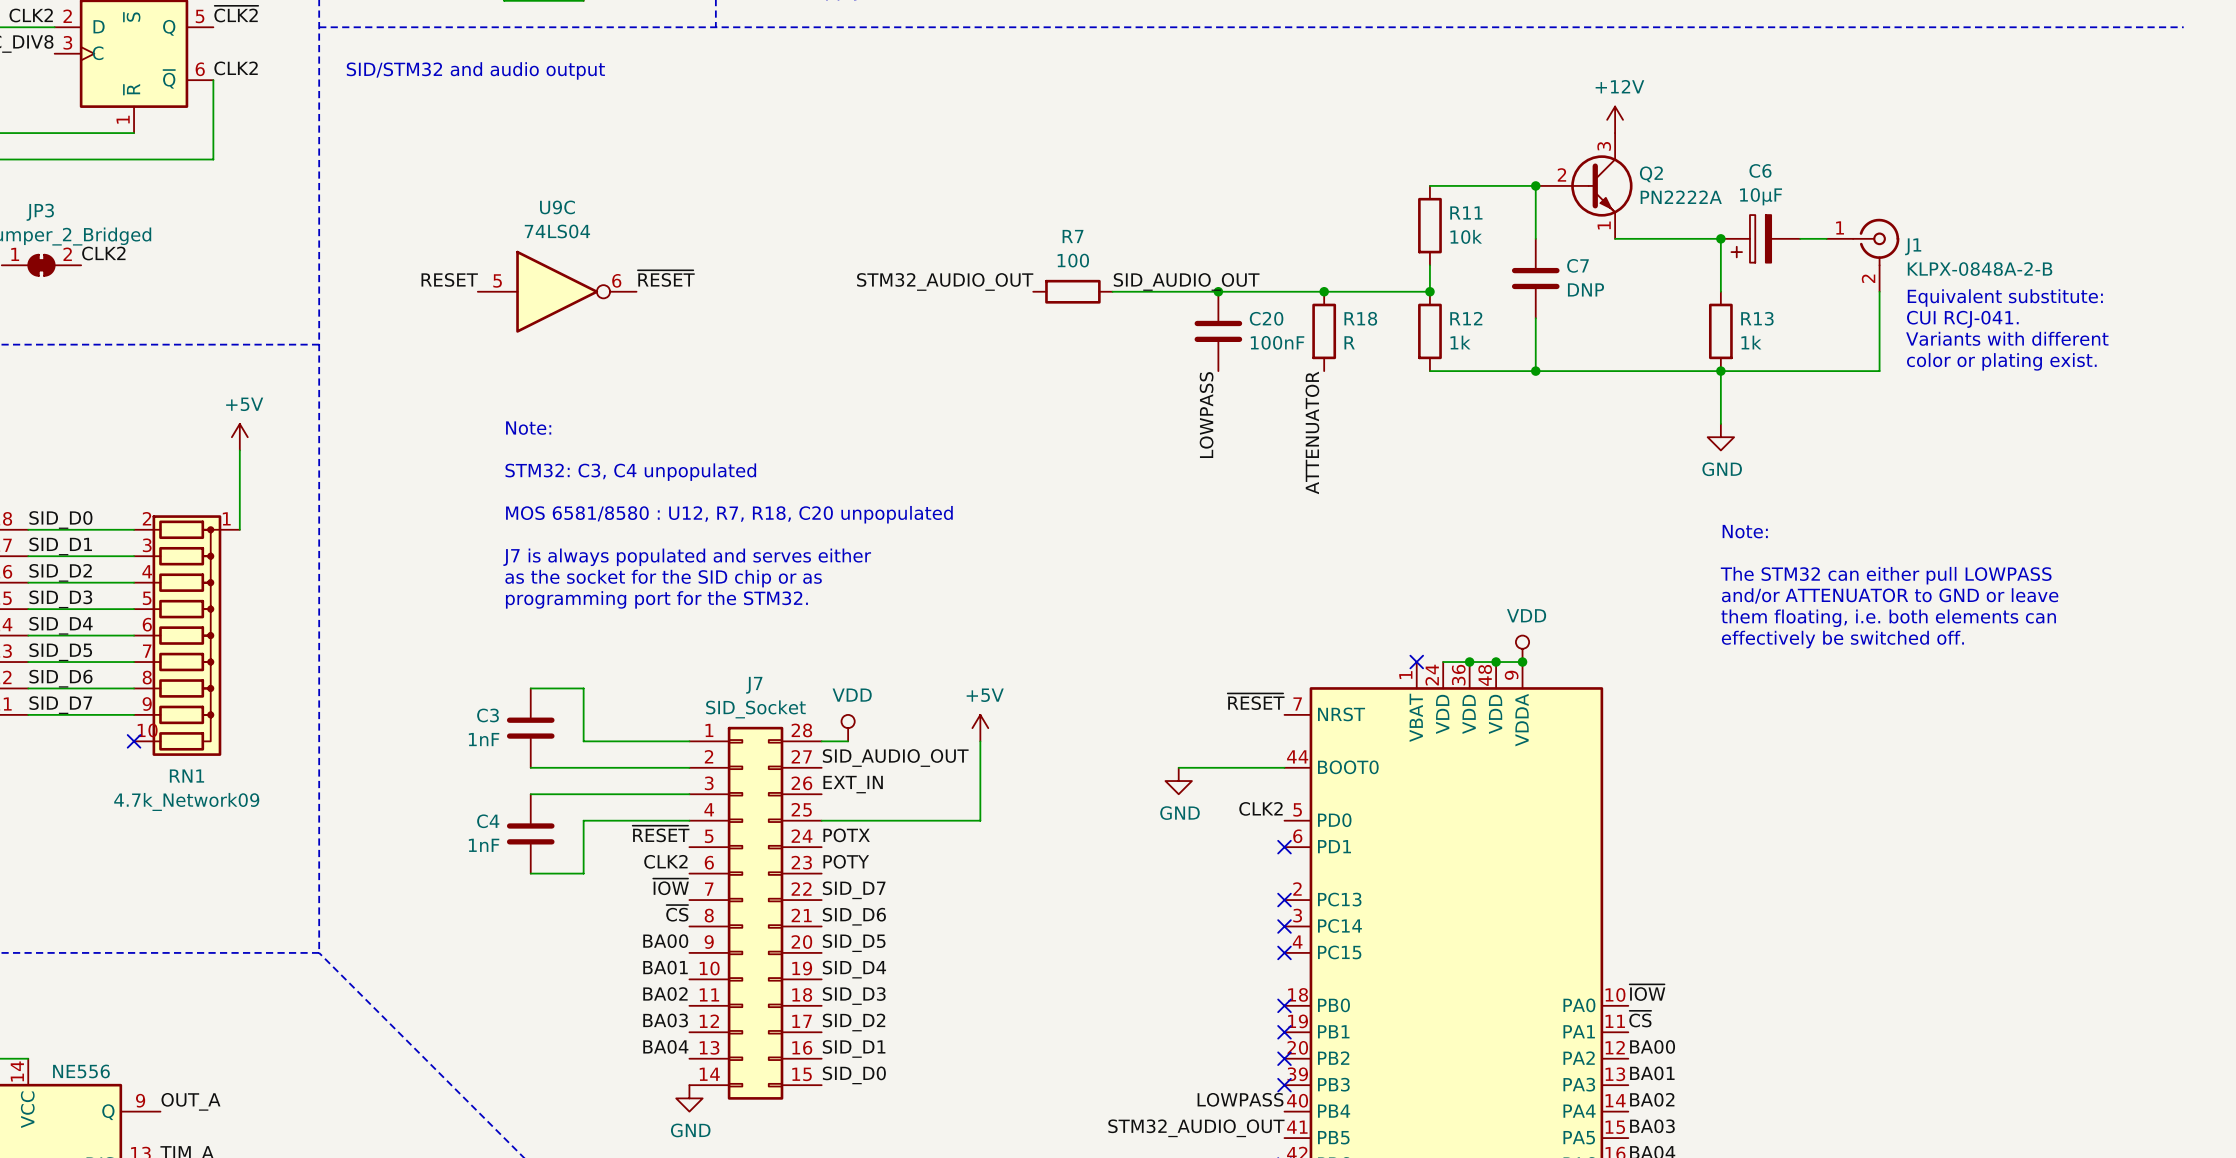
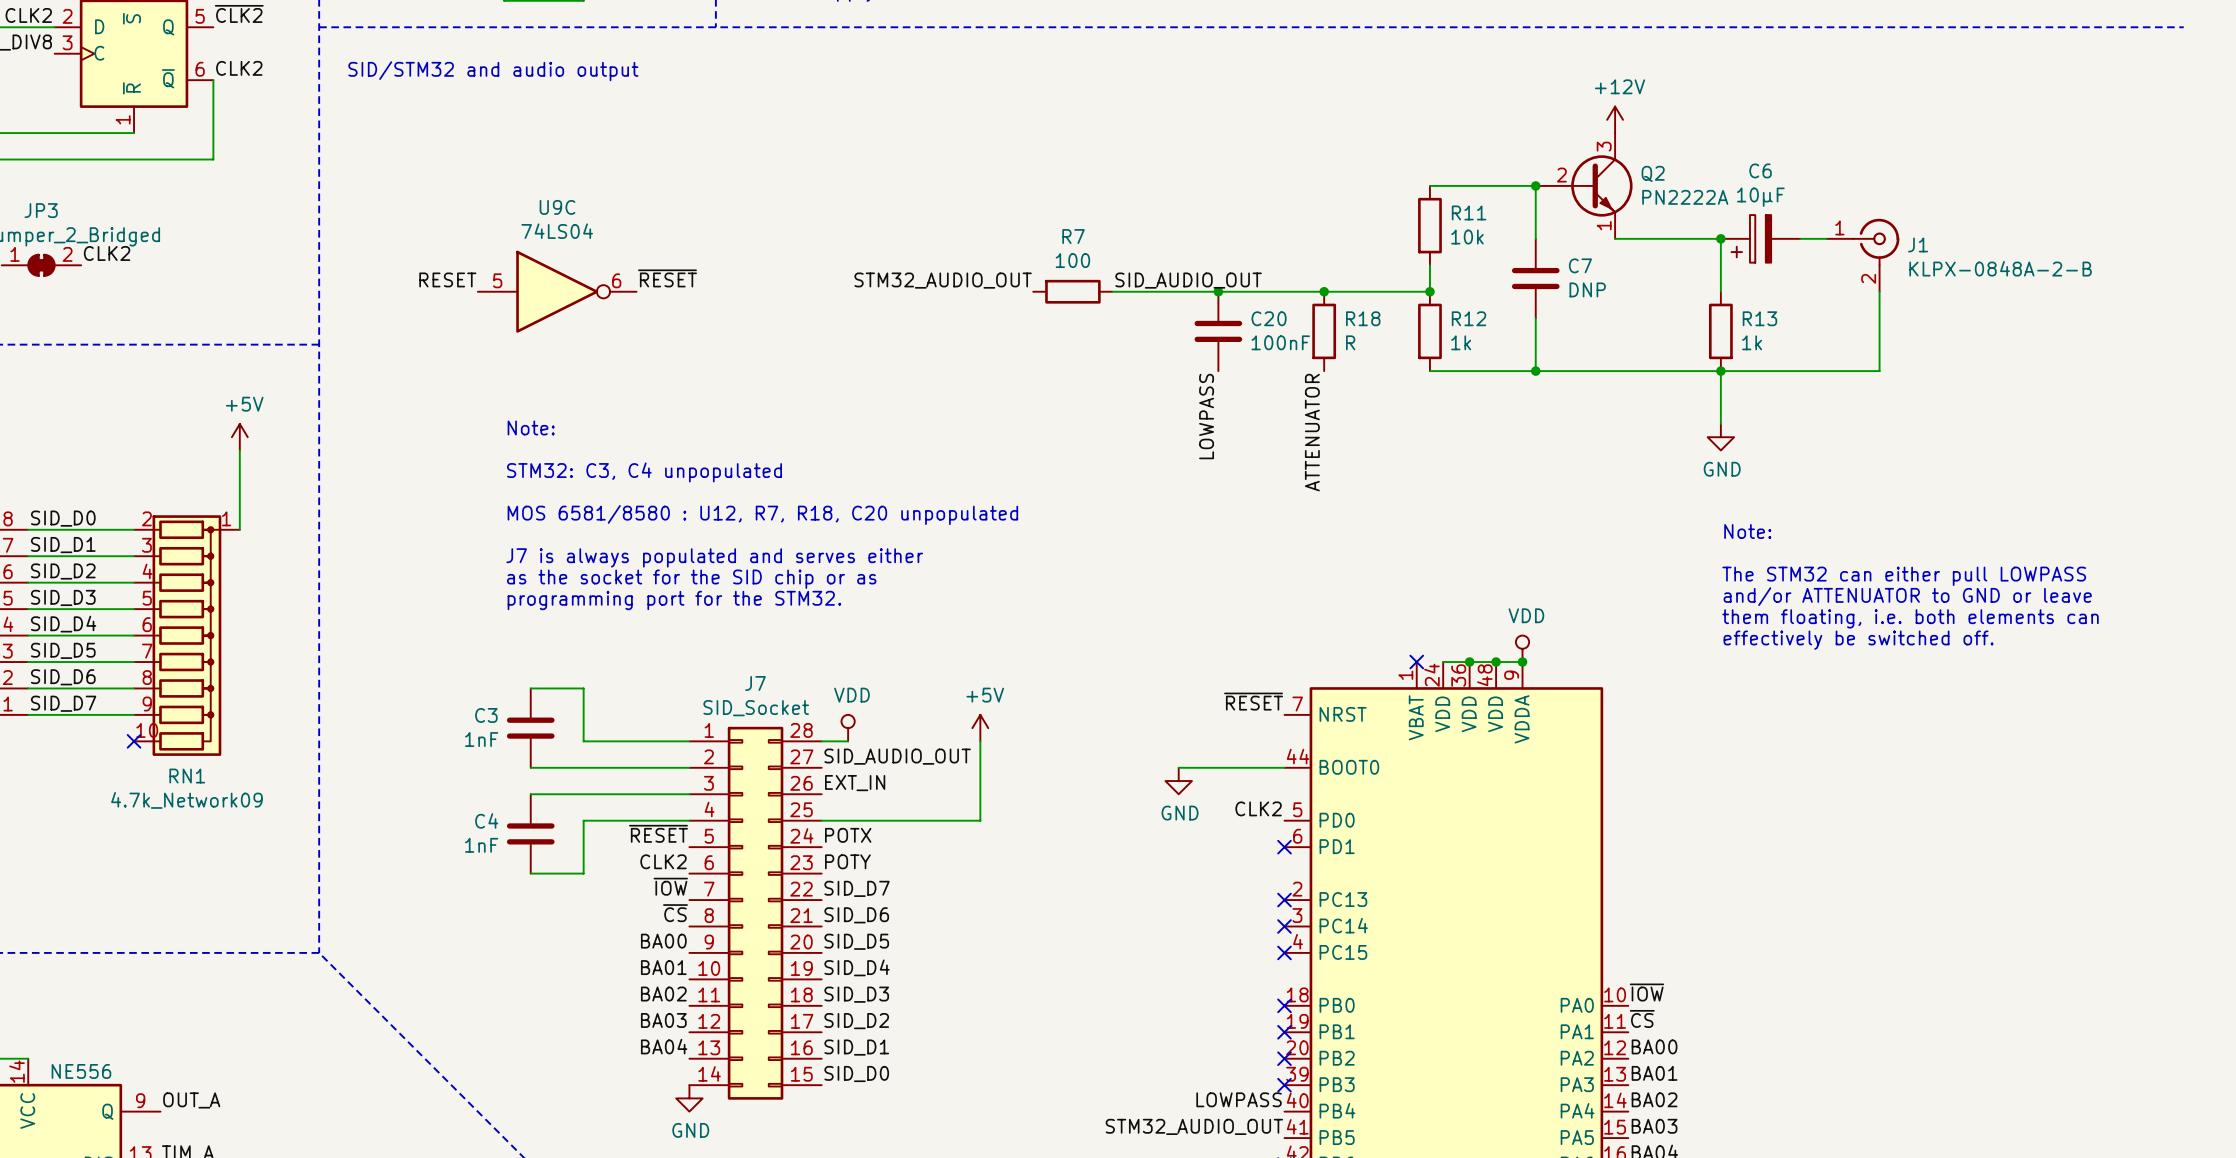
text: Equivalent substitute: (2005, 297) -> none
text: CUI RCJ-041. (1962, 319) -> none
text: Variants with different (2007, 338) -> none
text: color or plating exist. (2001, 361) -> none

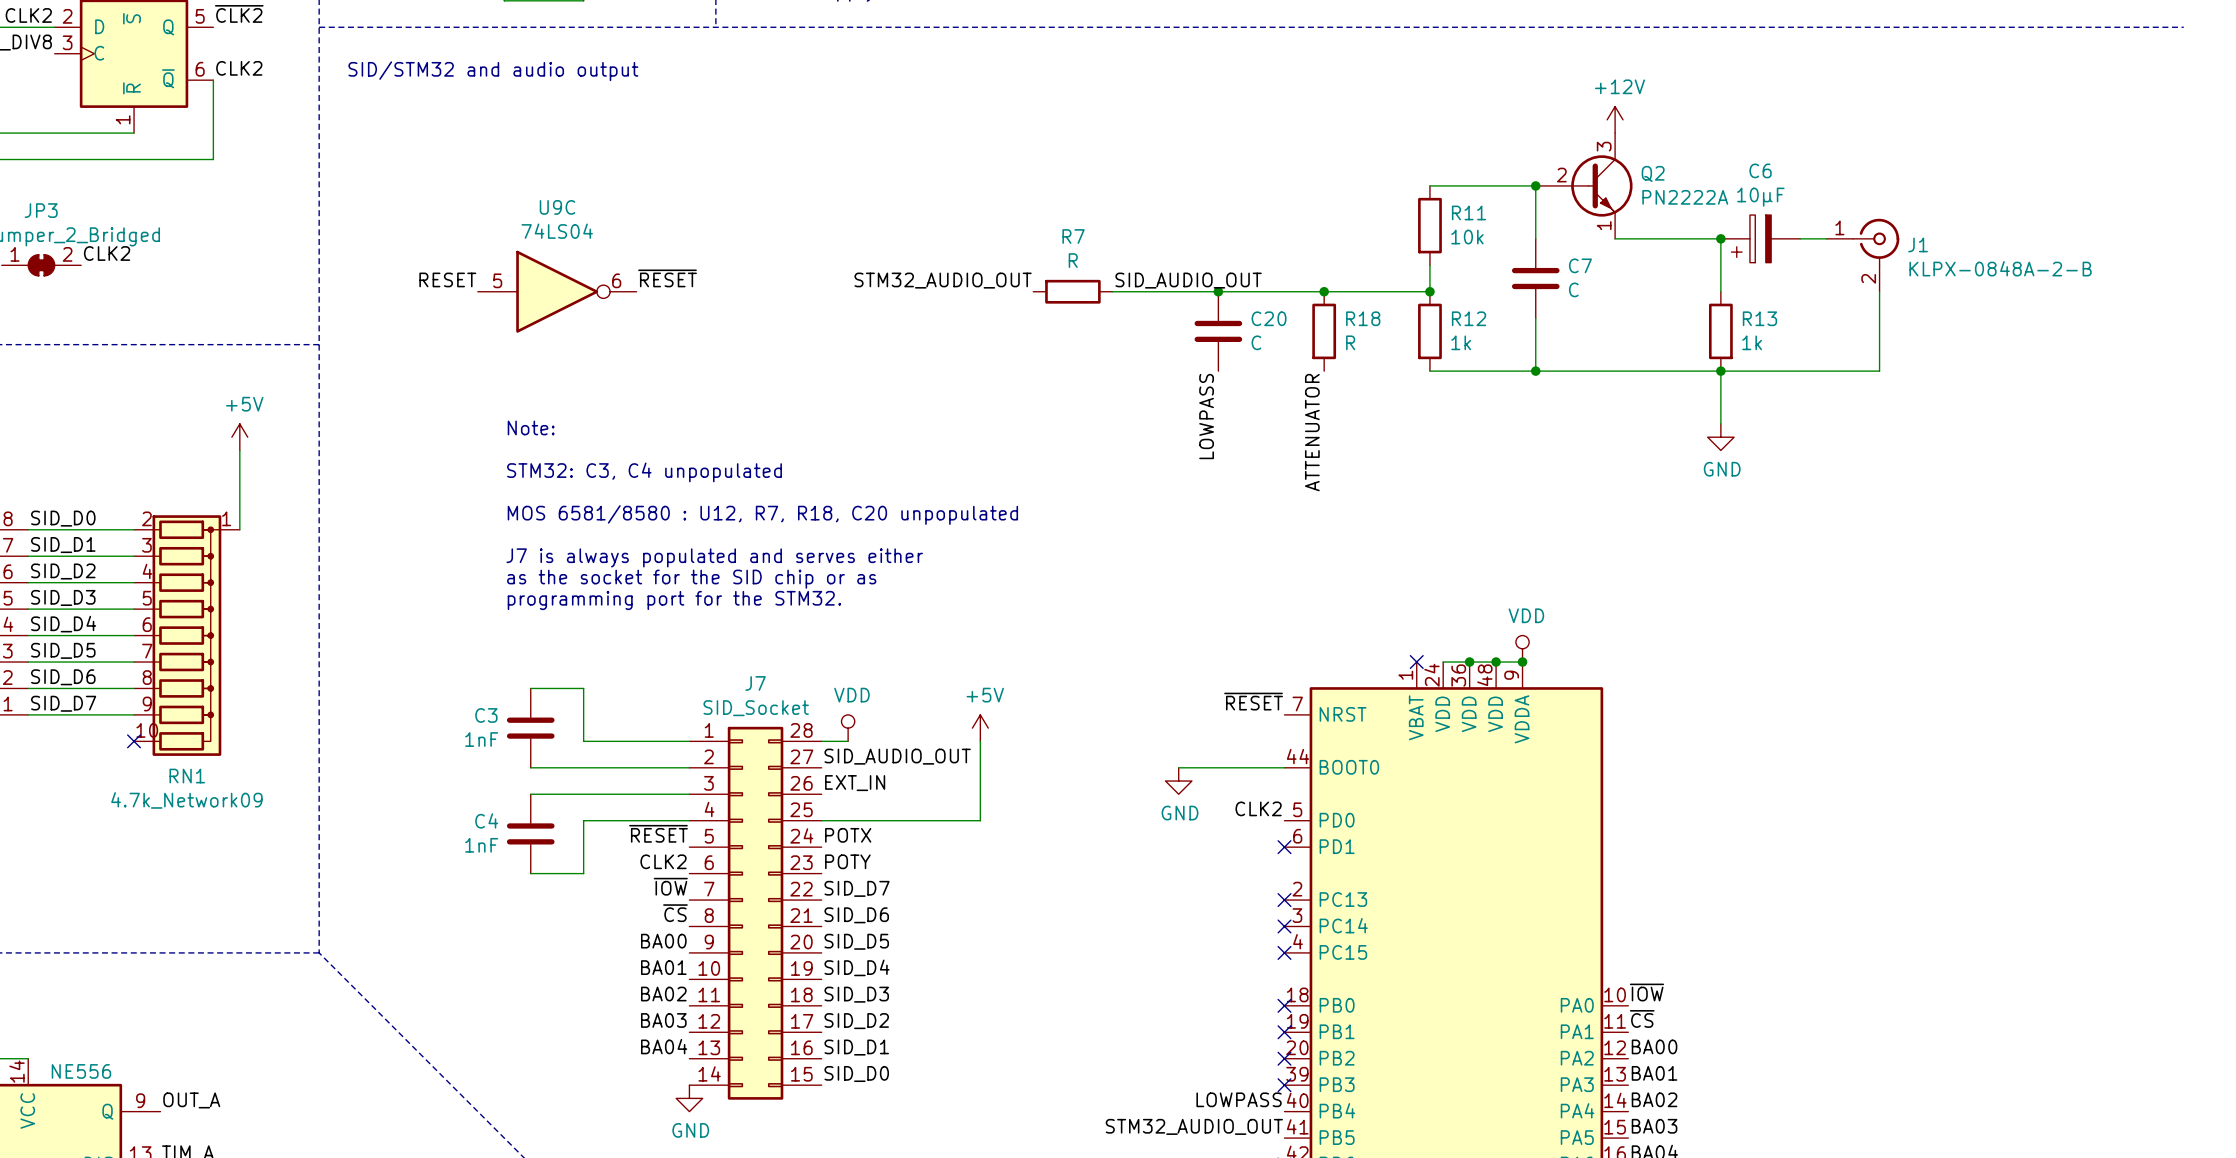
R7 value: 100 (1072, 260) -> R (1073, 260)
C7 value: DNP (1587, 289) -> C (1573, 289)
C20 value: 100nF (1280, 342) -> C (1256, 342)
text: Note: (1747, 531) -> none
text: The STM32 can either pull LOWPASS (1904, 576) -> none
text: and/or ATTENUATOR to GND or leave (1907, 596) -> none
text: them floating, i.e. both elements can (1910, 618) -> none
text: effectively be switched off. (1858, 640) -> none

